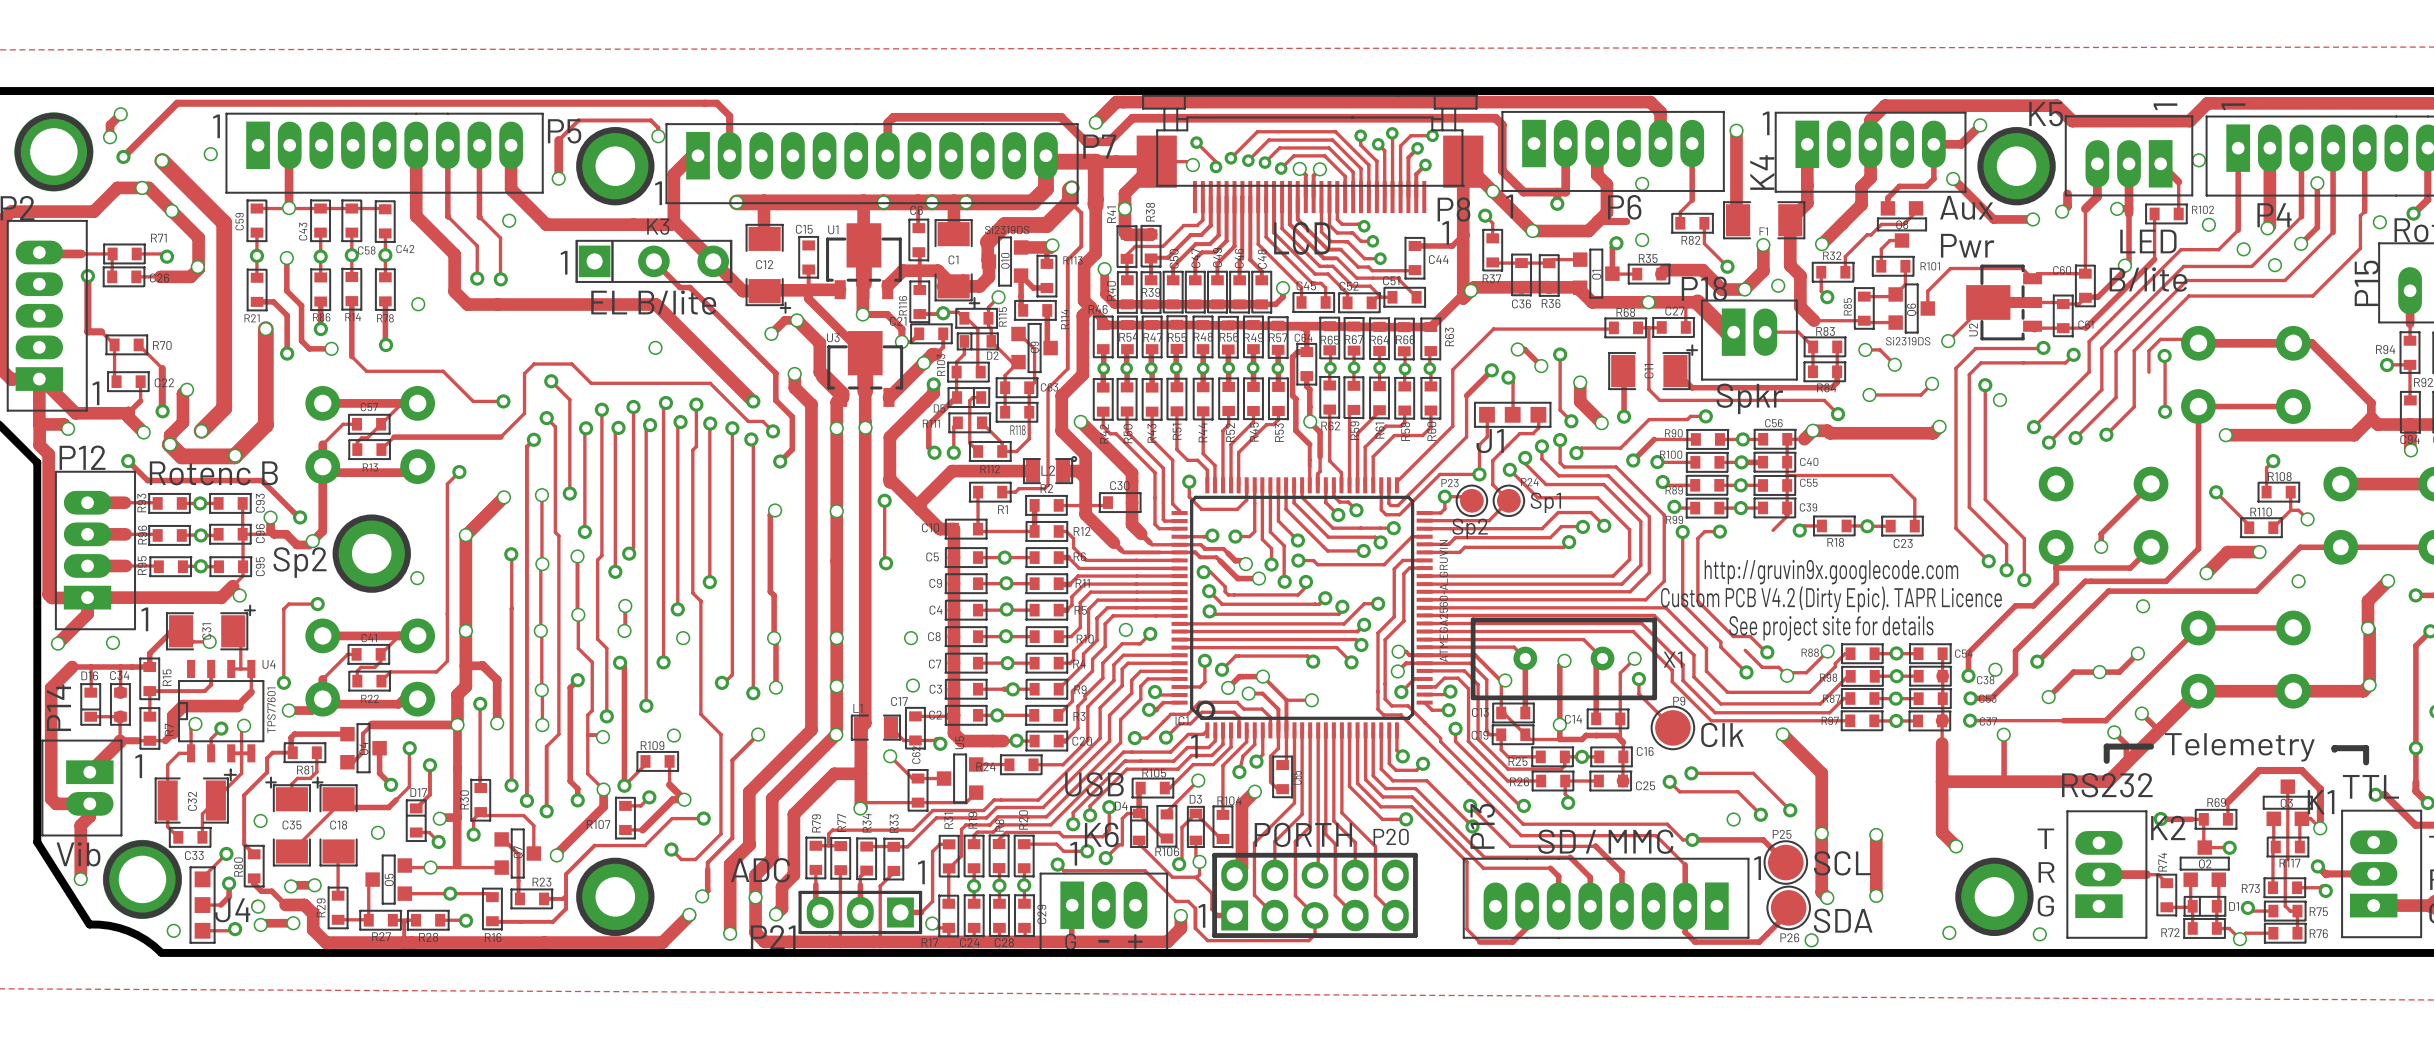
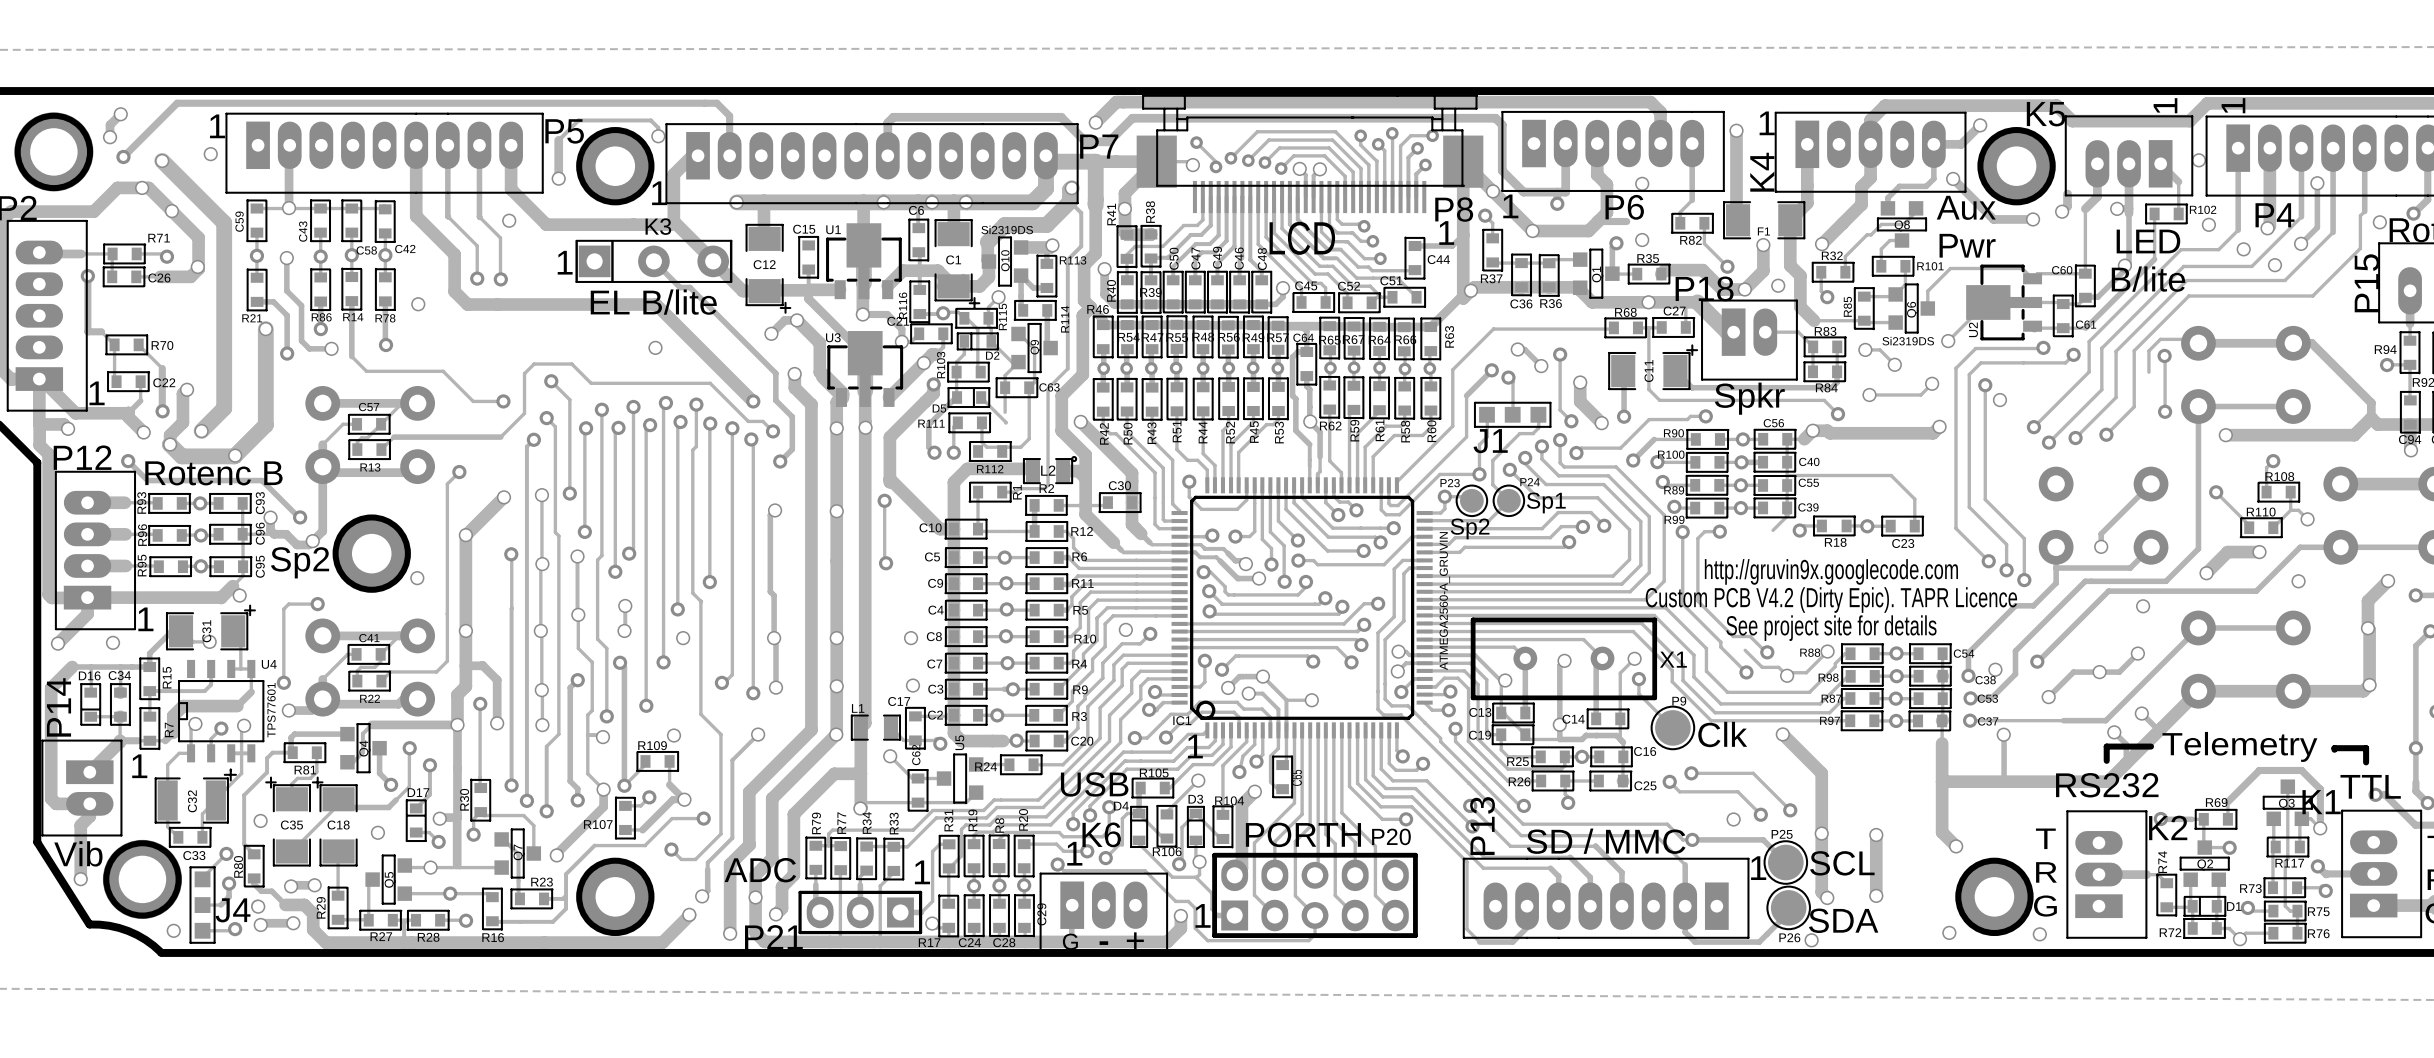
track: (981, 397) (972, 397) (969, 400) (969, 443) (978, 451) -> (981, 397) (1005, 423)
R118: (1017, 412) -> none
track: (981, 422) (1002, 443) (1002, 451) (1016, 451) (1020, 447) -> (981, 422) (981, 442) (986, 447) (1020, 447)
track: none -> (1028, 468) (967, 468) (953, 482) (953, 529)
track: (1032, 471) (952, 471) (920, 502) (920, 509) -> none
R1 name rotation: 0° (1002, 509) -> 90° counterclockwise (1017, 492)
R1 name position: R1 (1002, 509) -> R1 (1017, 492)

